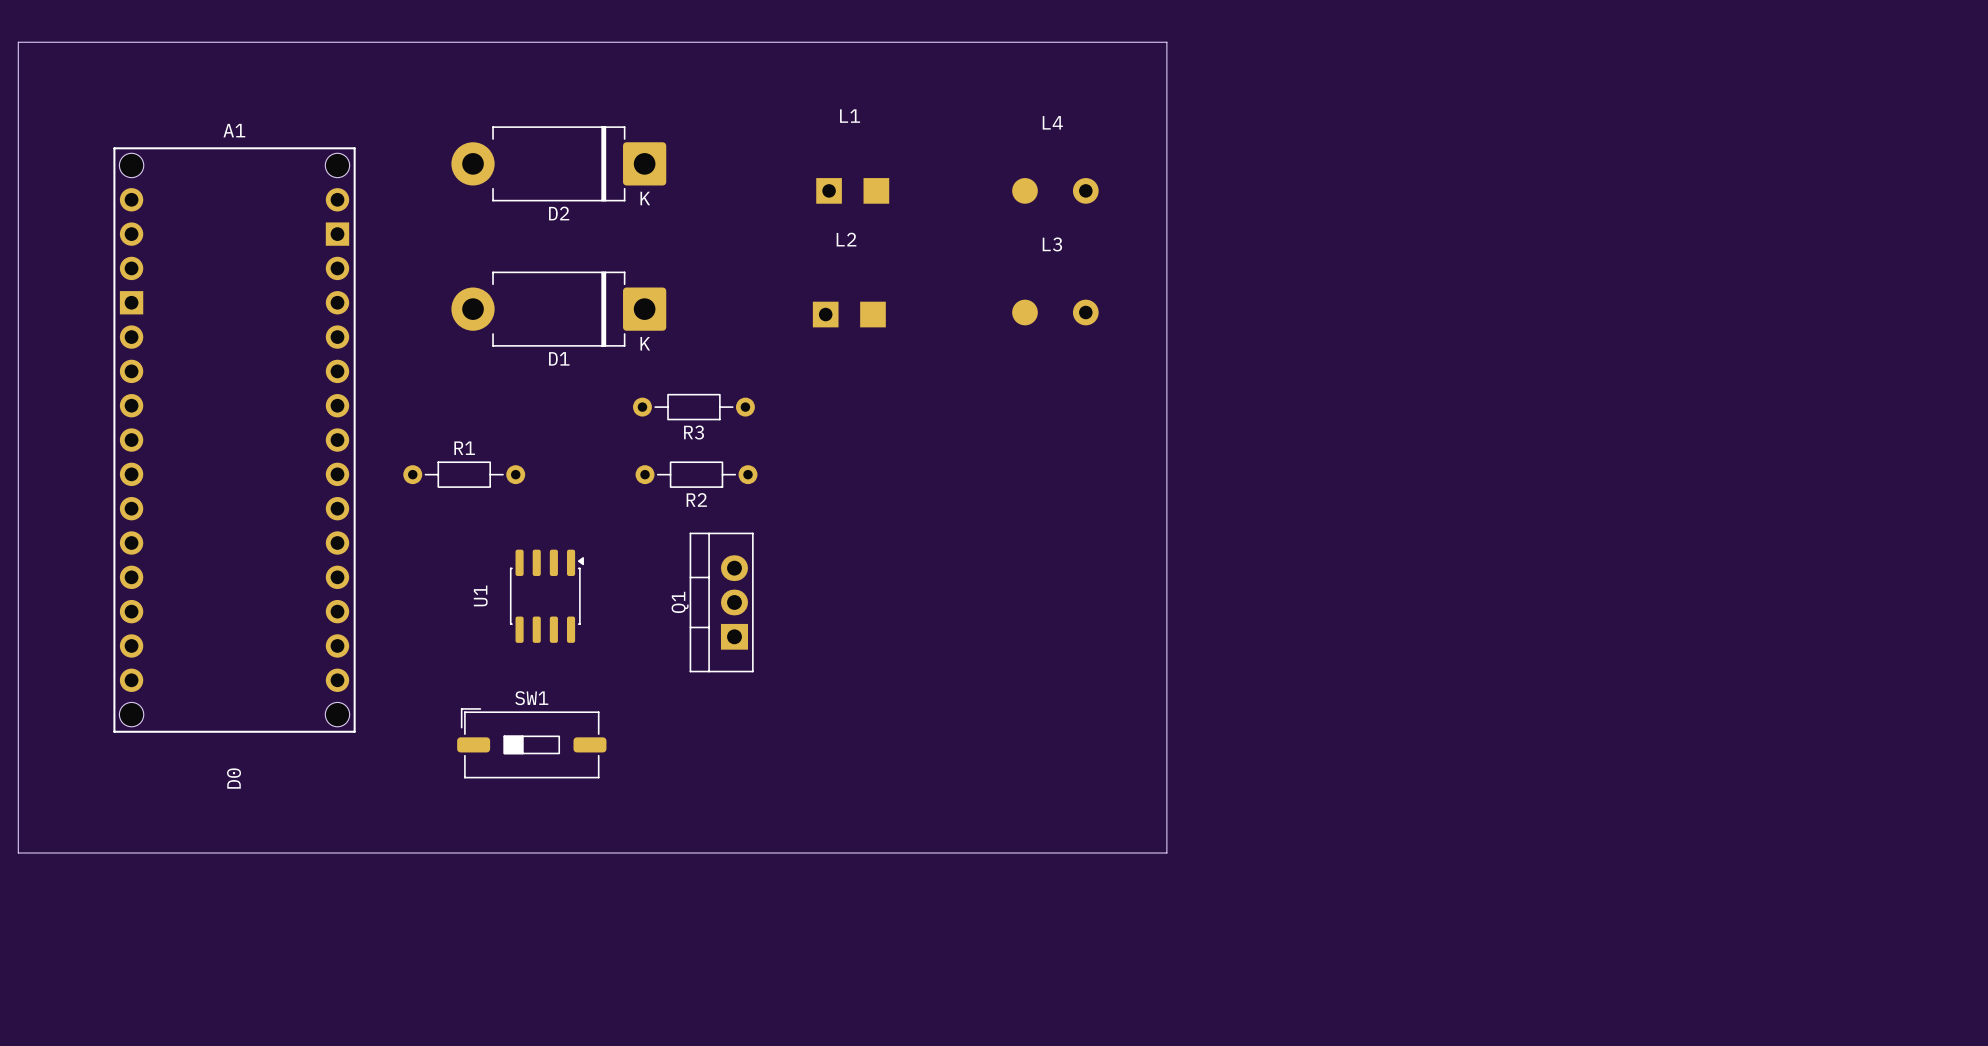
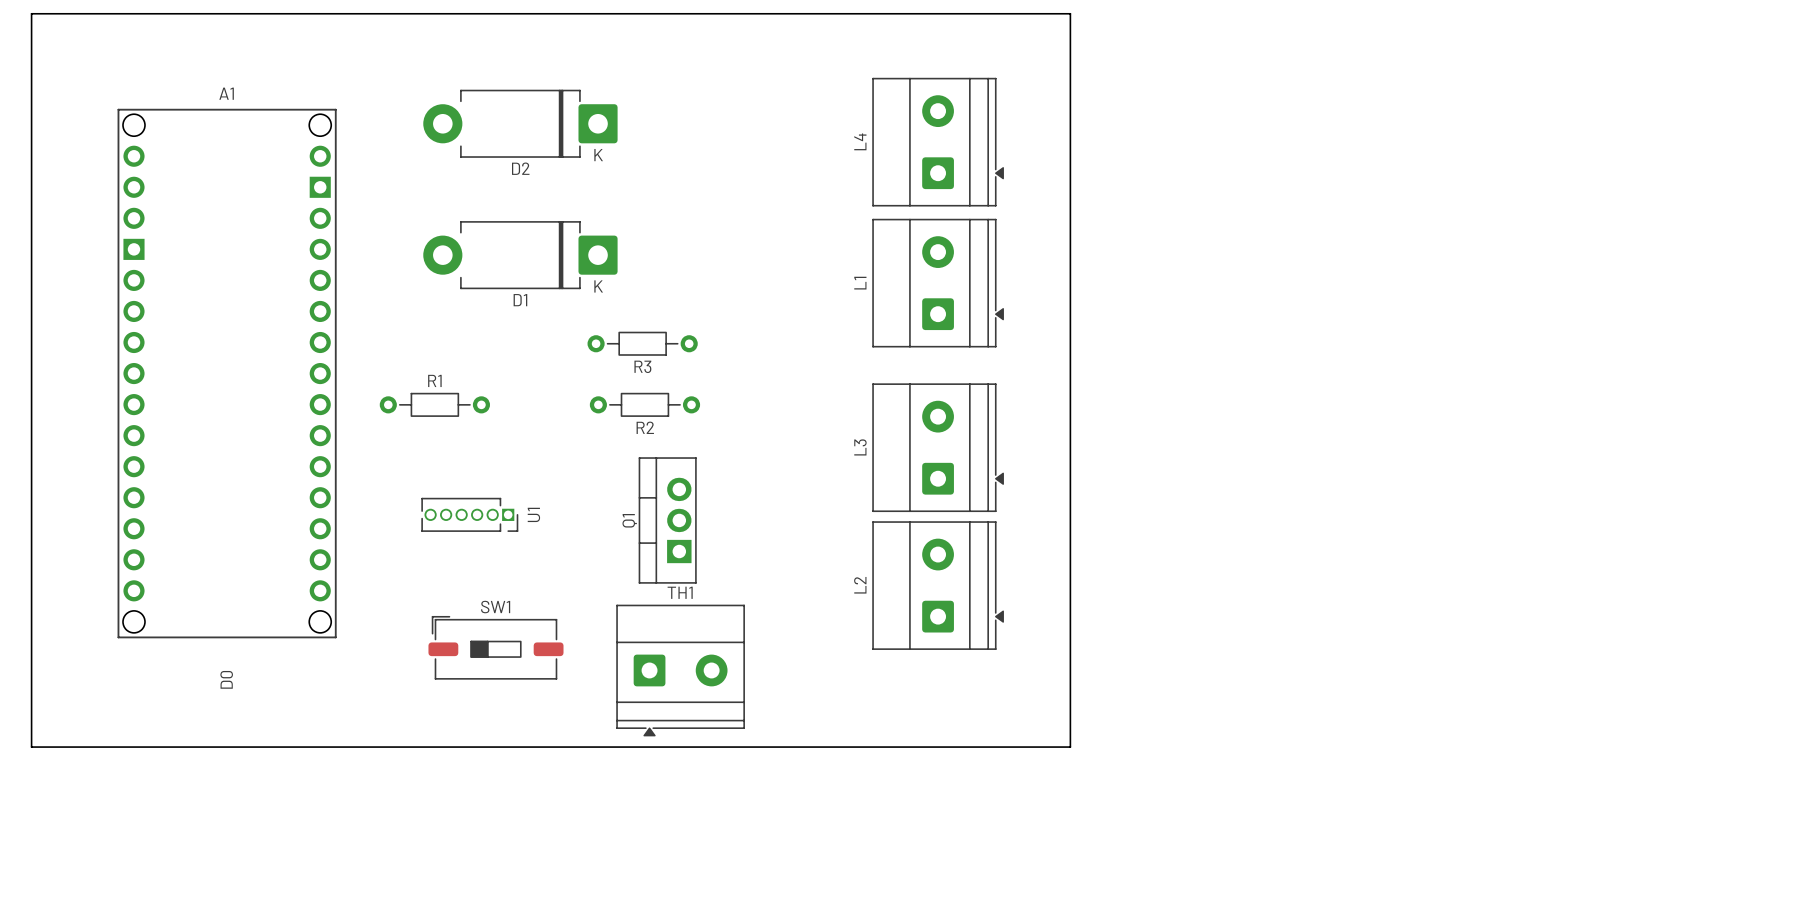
L1 name position: L1 (850, 116) -> L1 (860, 283)
L4 name position: L4 (1052, 122) -> L4 (860, 141)
L1 footprint: [816, 178, 890, 204] -> [872, 218, 1004, 348]
L4 footprint: [1012, 178, 1099, 204] -> [872, 77, 1004, 207]
L2 name position: L2 (846, 239) -> L2 (860, 585)
L3 name position: L3 (1052, 244) -> L3 (860, 447)
L3 footprint: [1012, 299, 1099, 326] -> [872, 383, 1004, 512]
L2 footprint: [812, 301, 886, 328] -> [872, 521, 1004, 650]
U1 footprint: [509, 549, 584, 643] -> [421, 497, 519, 532]
U1 name position: U1 (480, 595) -> U1 (533, 514)
TH1: none -> (680, 670)

